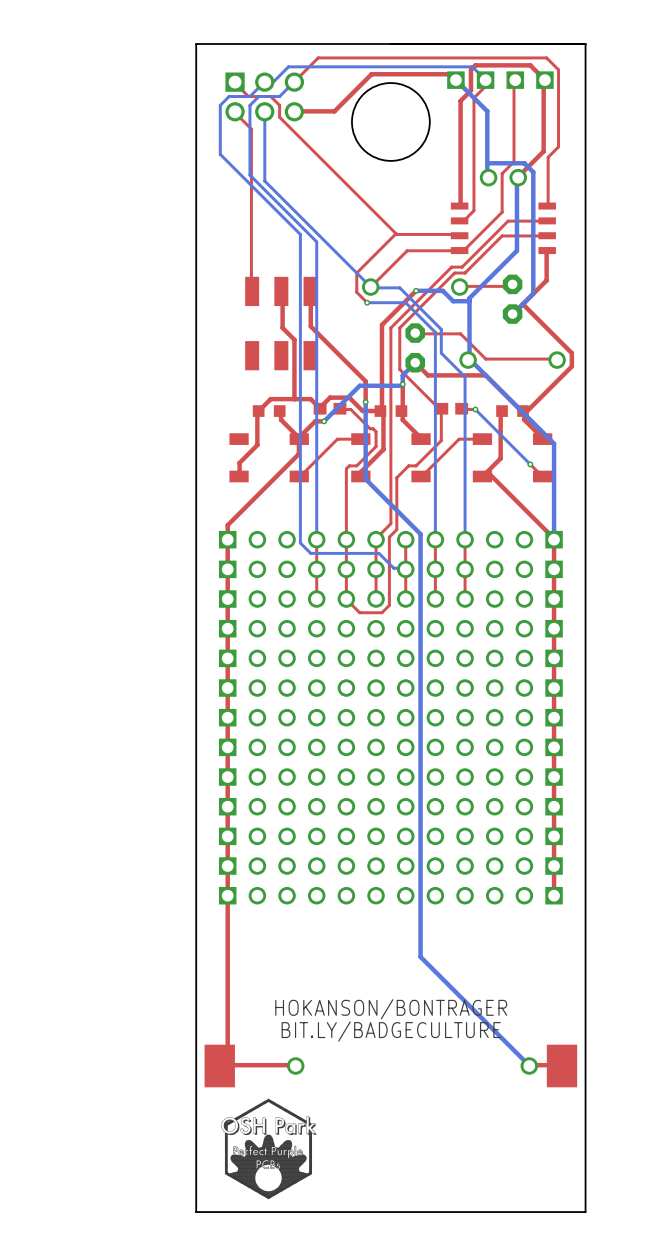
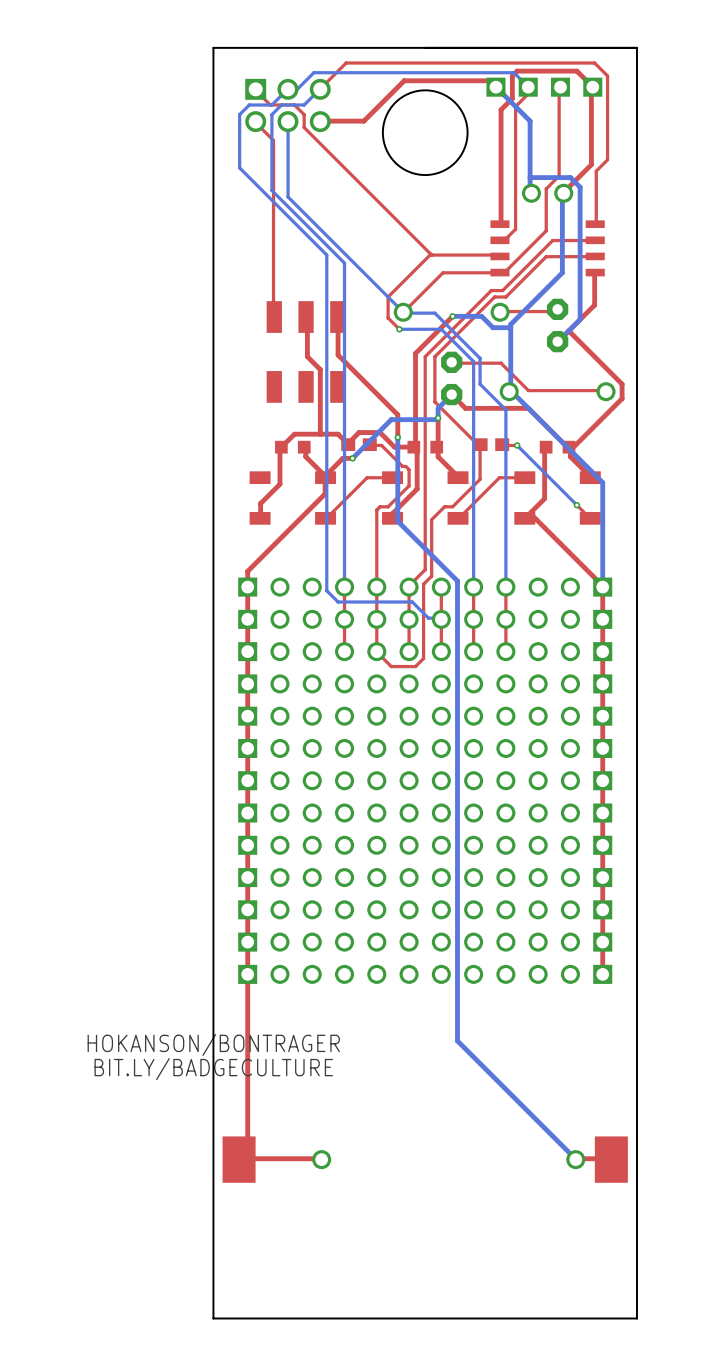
text position: HOKANSON/BONTRAGER (391, 1009) -> HOKANSON/BONTRAGER (213, 1044)
text position: BIT.LY/BADGECULTURE (391, 1031) -> BIT.LY/BADGECULTURE (213, 1069)
drawing: [221, 1098, 317, 1200] -> none

